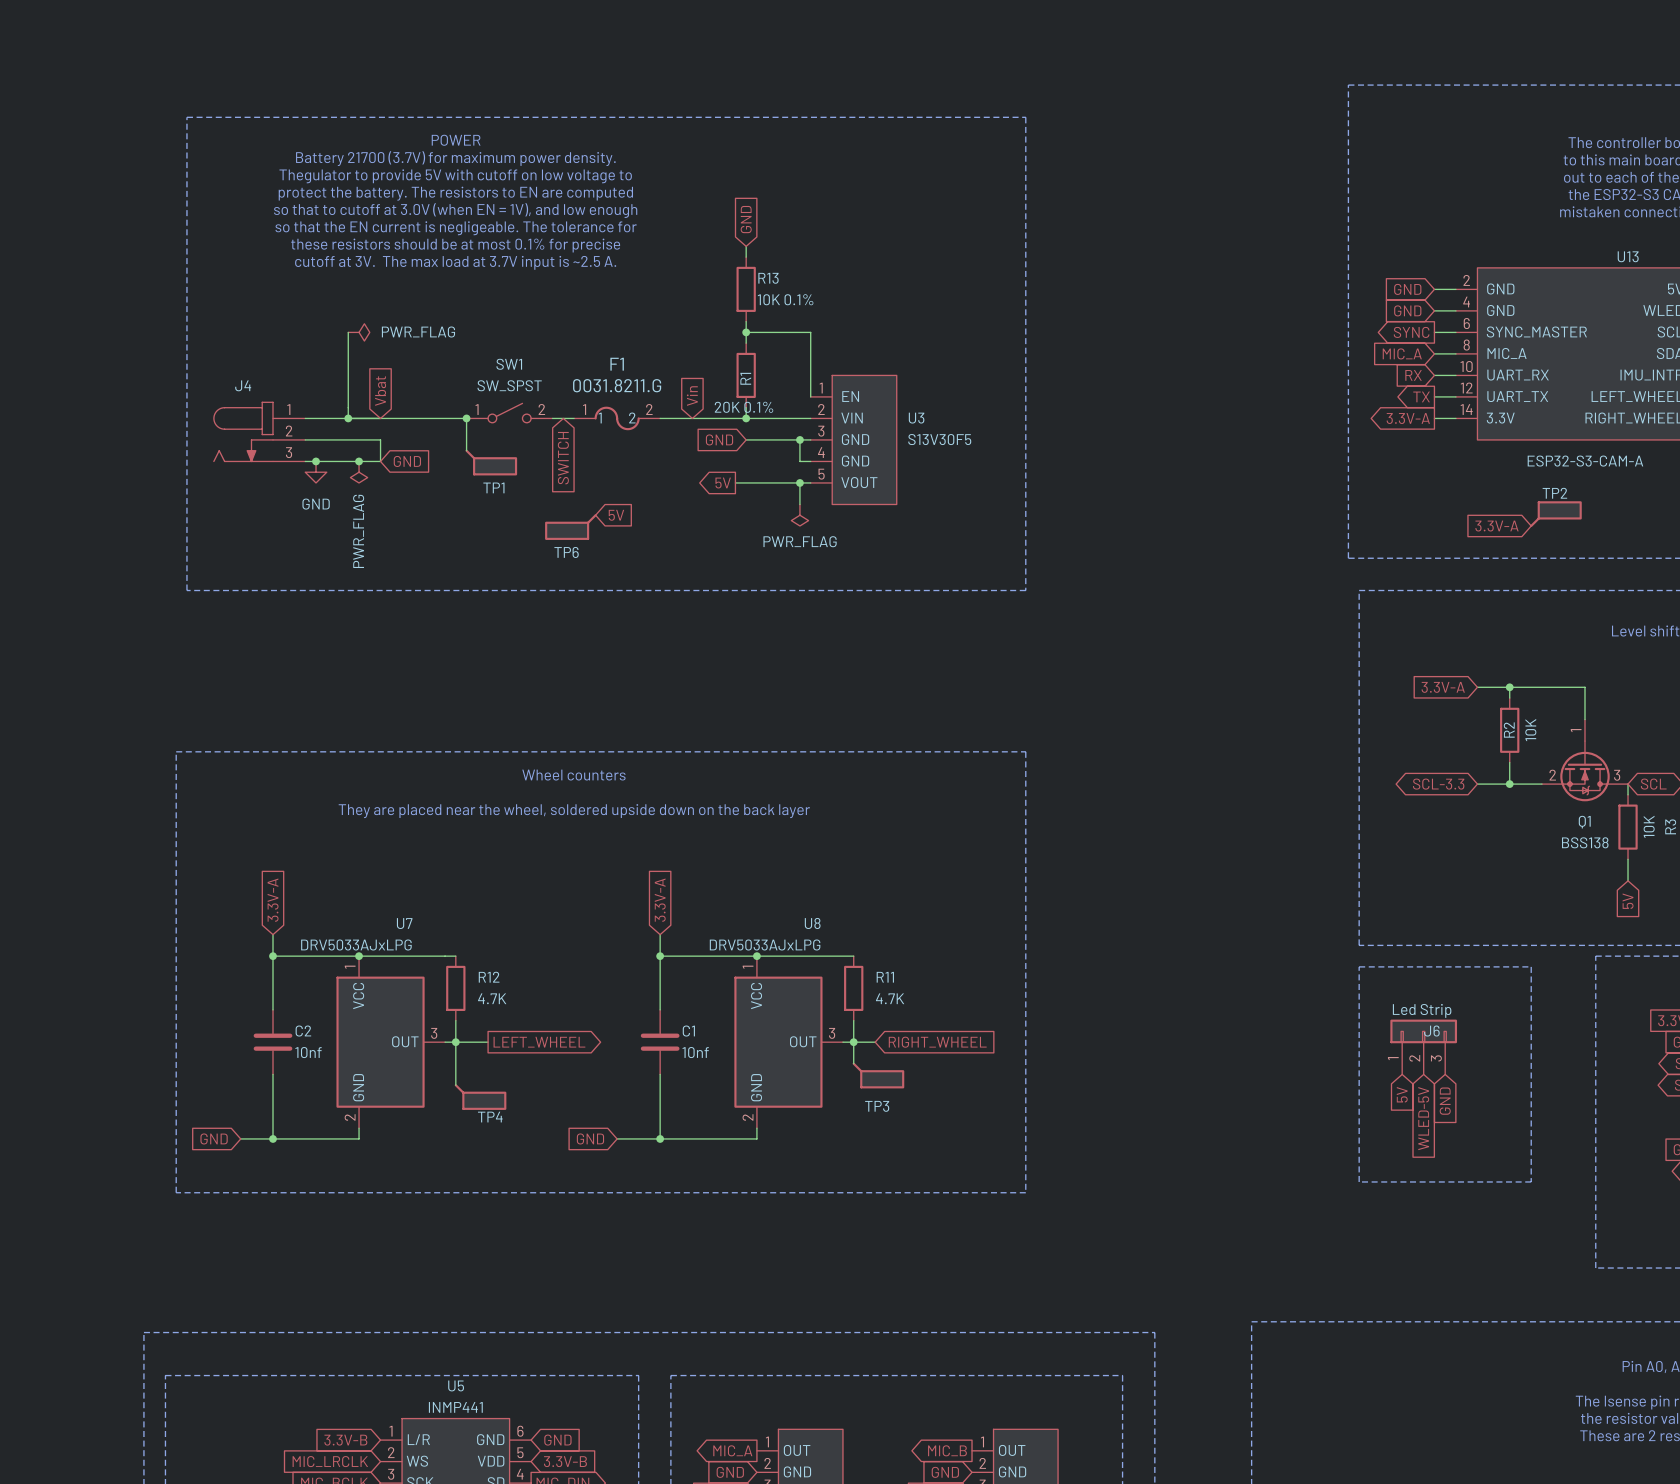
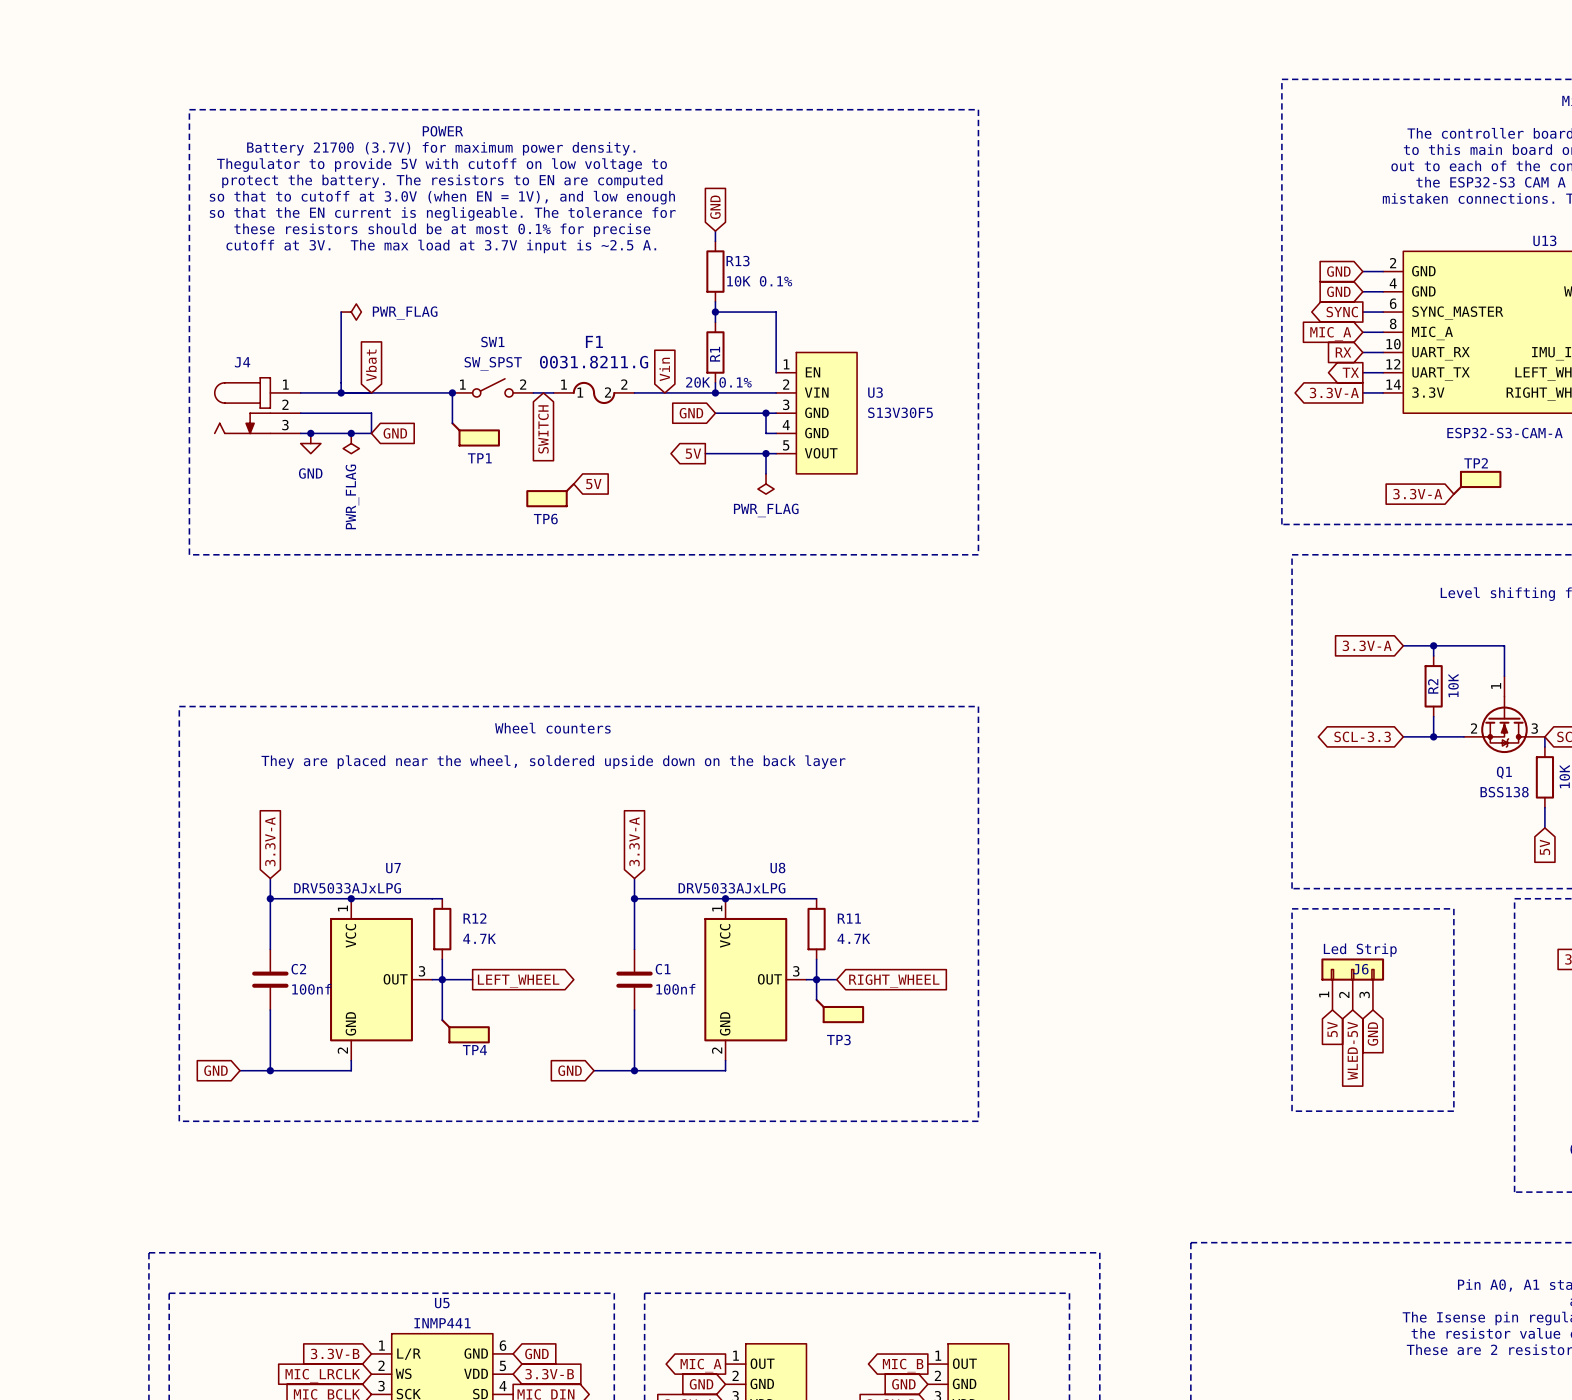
C2 value: 10nf (308, 1052) -> 100nf (311, 989)
C1 value: 10nf (695, 1052) -> 100nf (675, 989)

